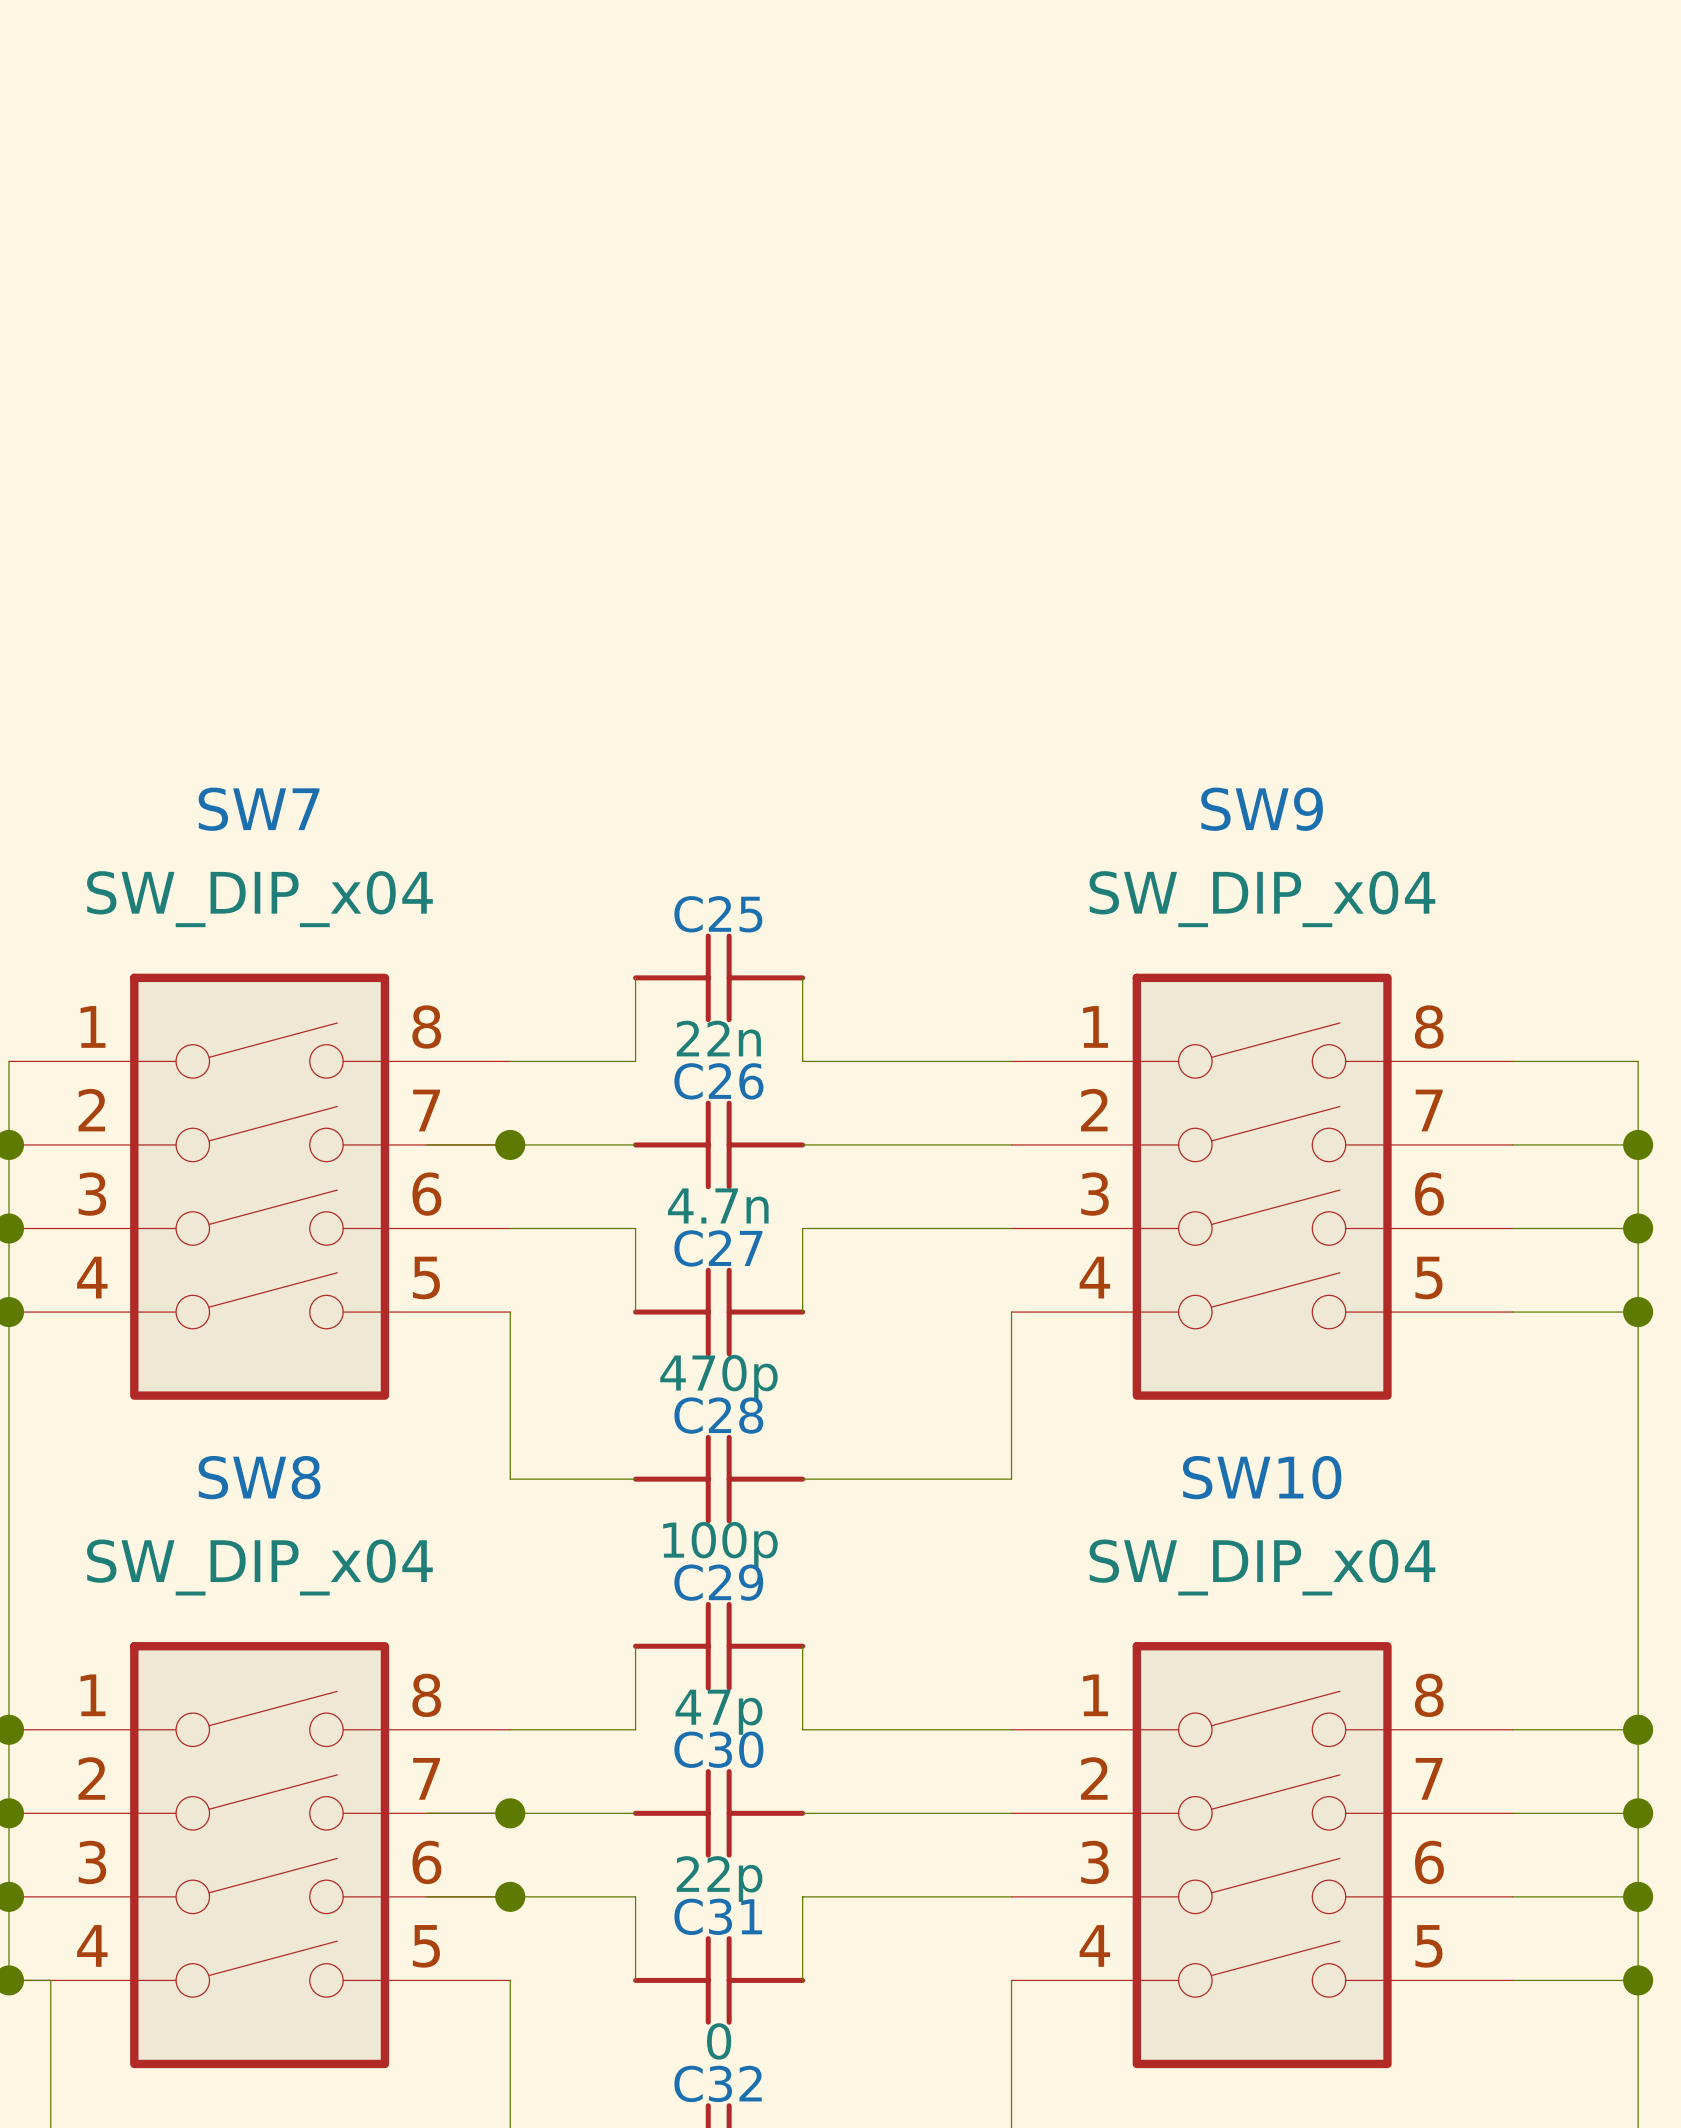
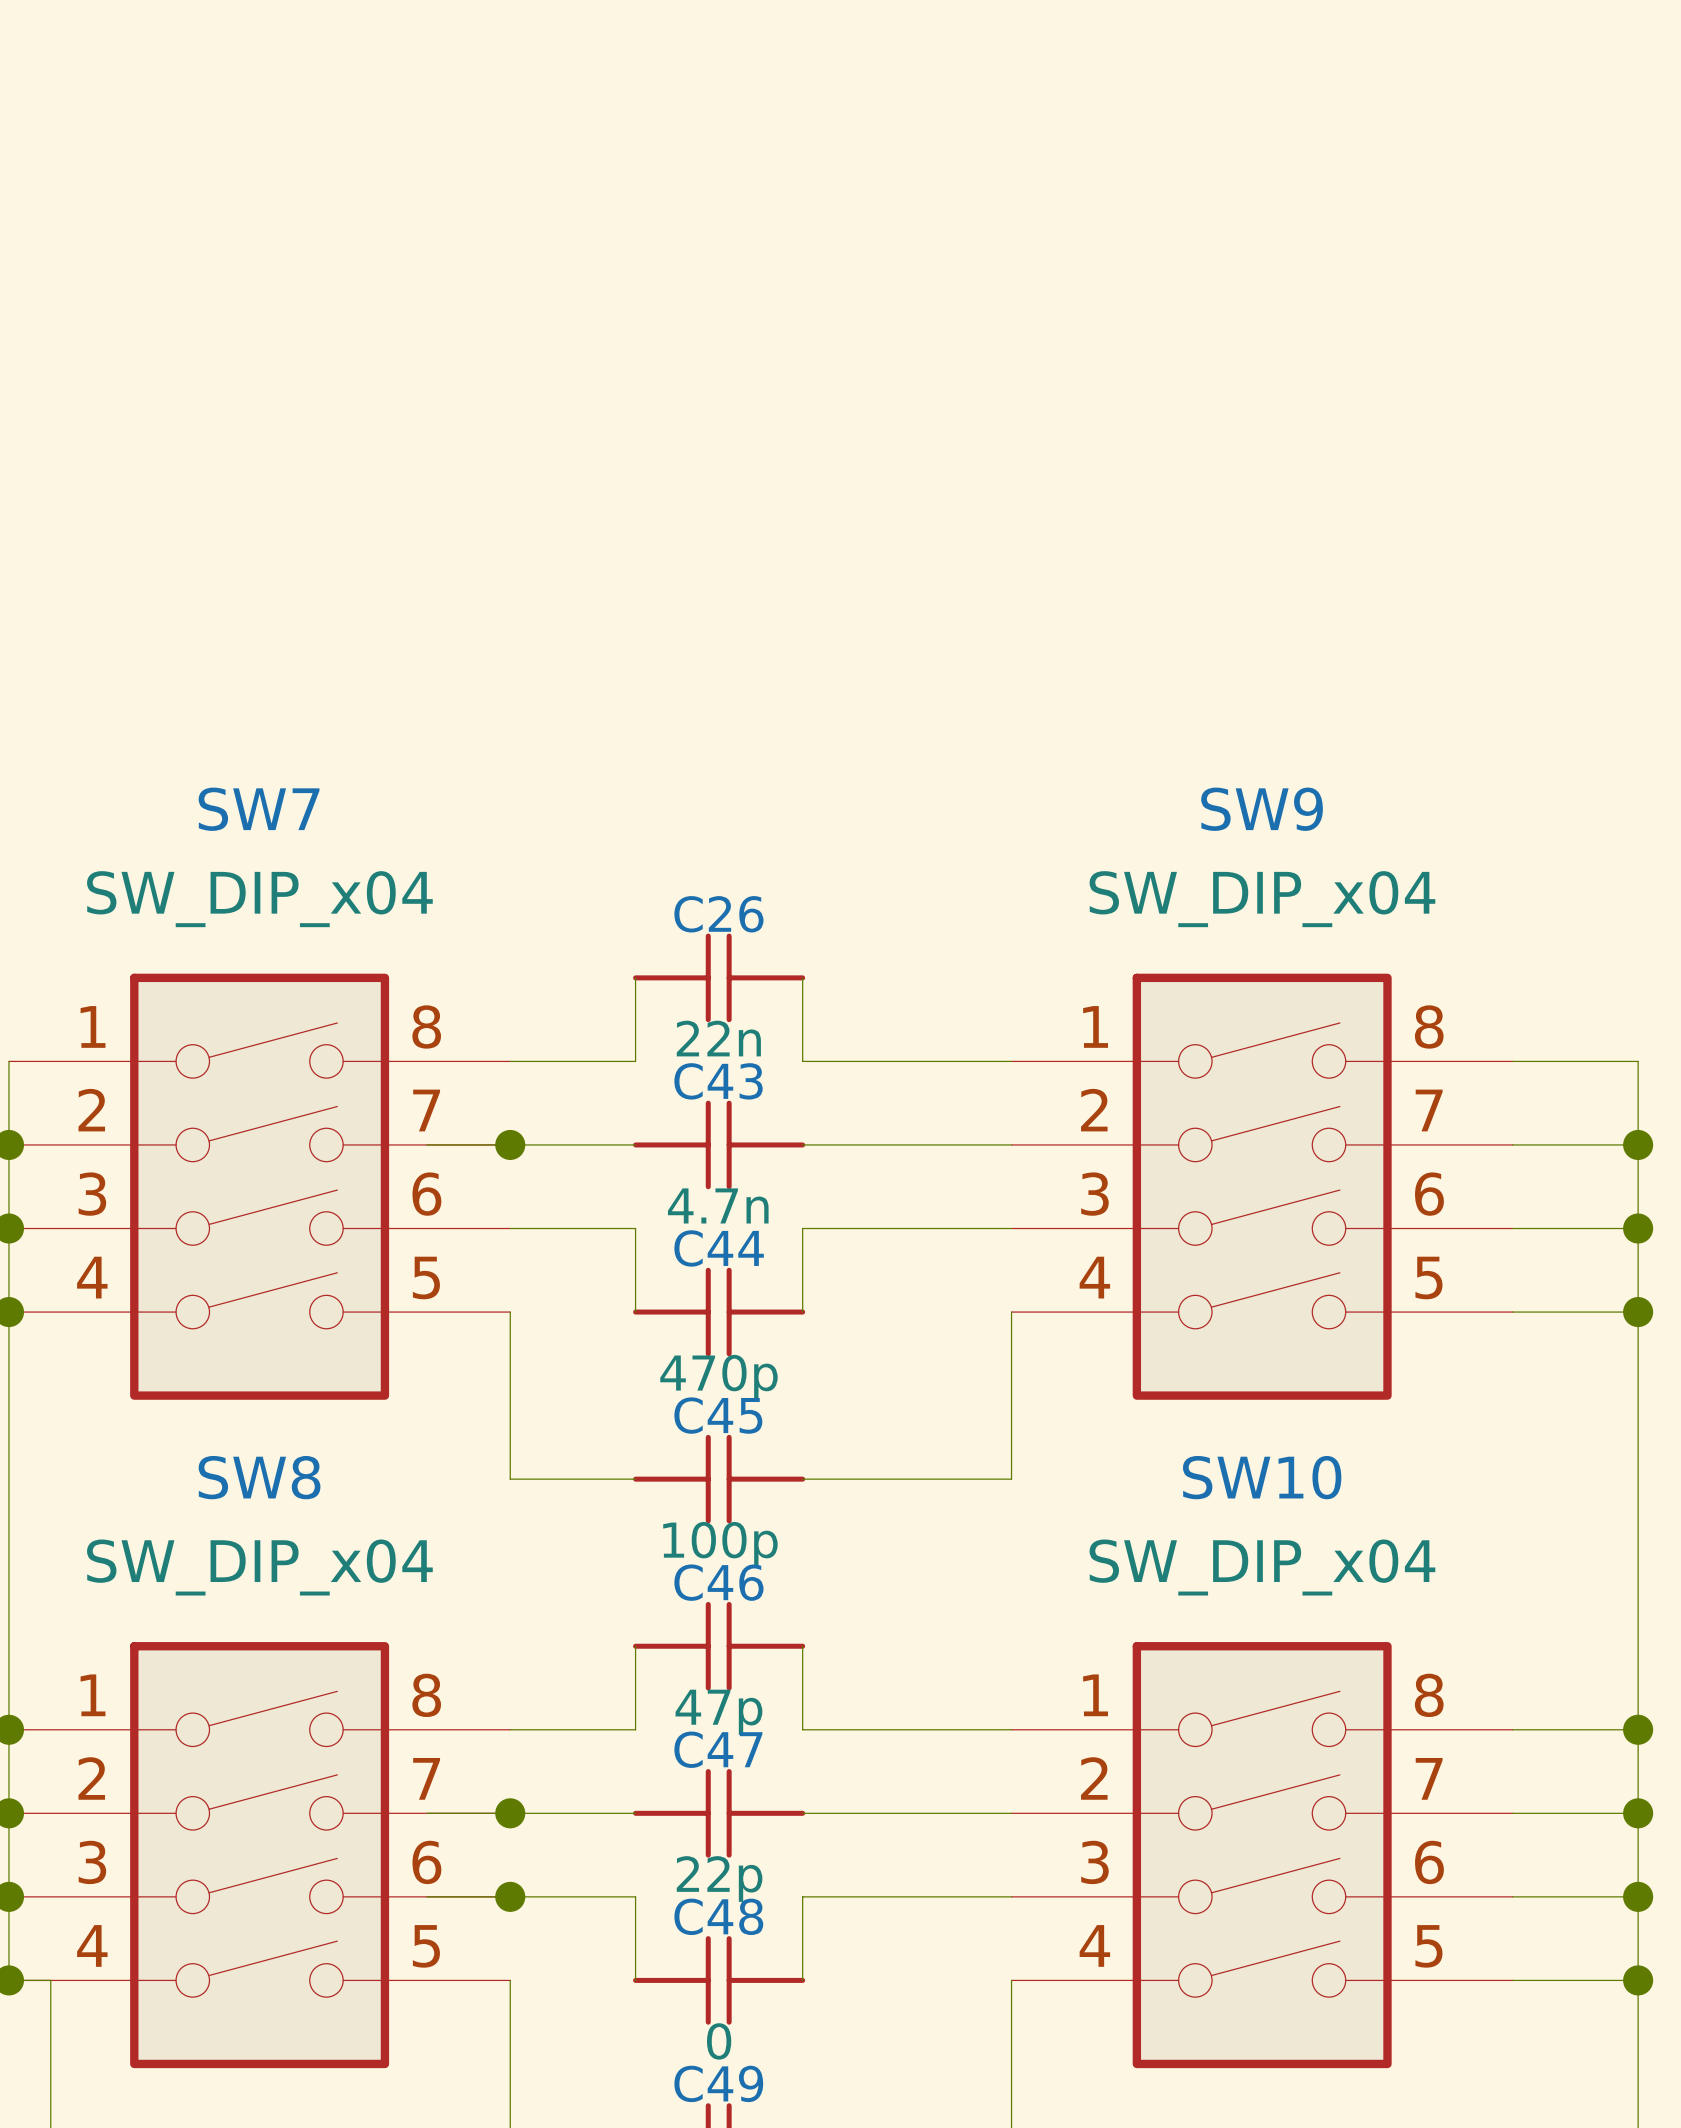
C25 name: C25 (718, 914) -> C26 (718, 914)
C26 name: C26 (718, 1081) -> C43 (718, 1081)
C27 name: C27 (718, 1248) -> C44 (719, 1248)
C28 name: C28 (718, 1415) -> C45 (718, 1415)
C29 name: C29 (718, 1582) -> C46 (718, 1582)
C30 name: C30 (718, 1749) -> C47 (718, 1749)
C31 name: C31 (718, 1916) -> C48 (718, 1916)
C32 name: C32 (718, 2083) -> C49 (718, 2083)

